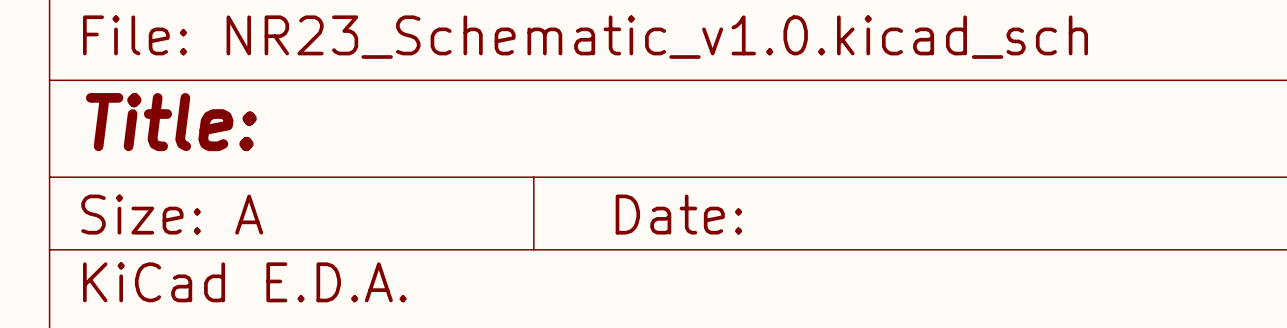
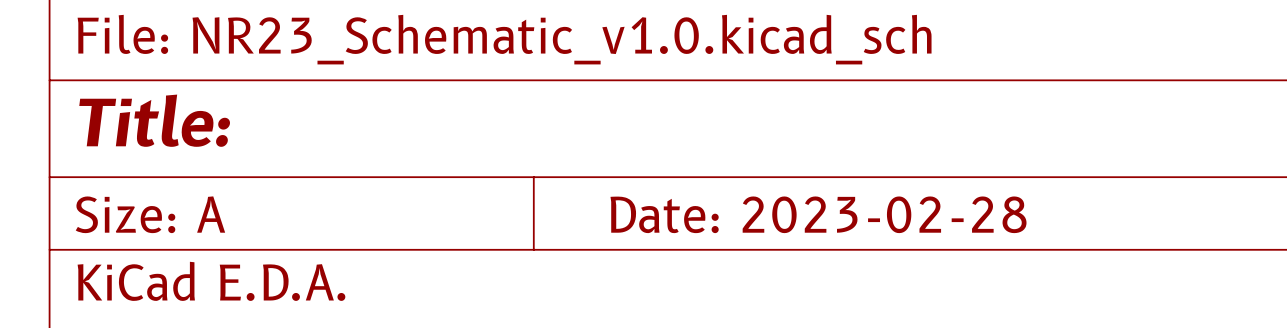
title block: Date: (678, 214) -> Date: 2023-02-28 (818, 214)

